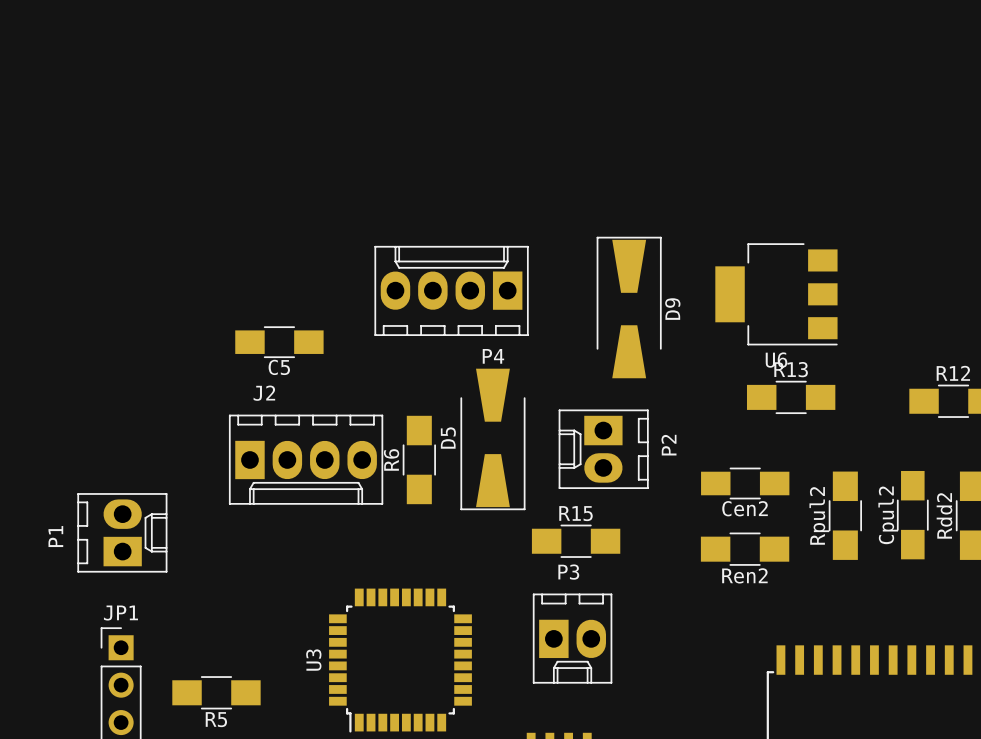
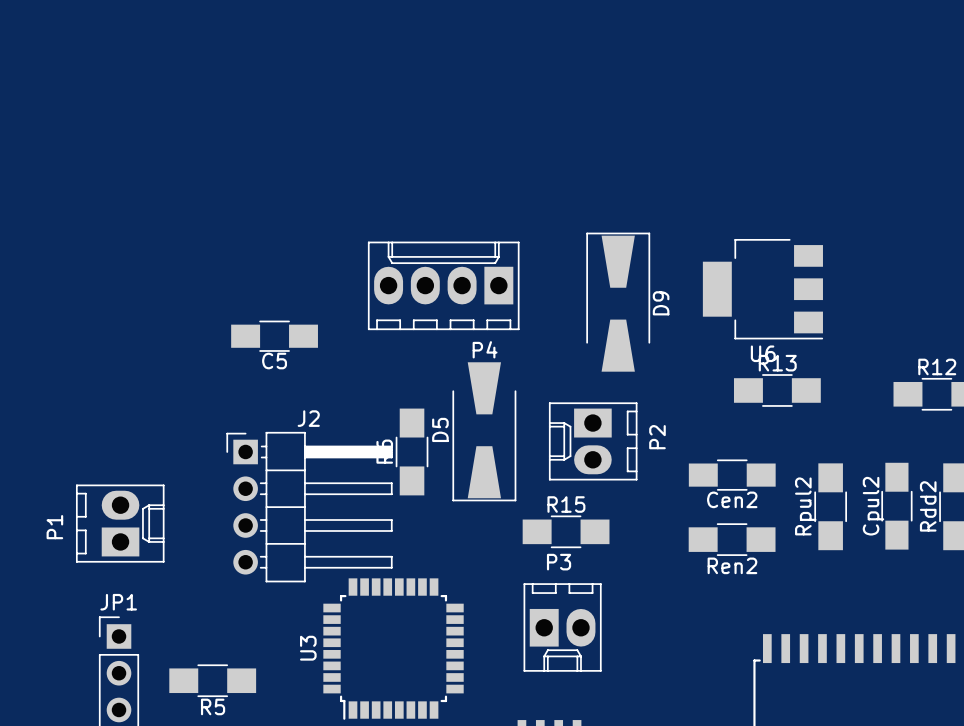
J2 name position: J2 (264, 393) -> J2 (308, 418)
J2 footprint: [228, 414, 384, 505] -> [226, 431, 393, 583]

